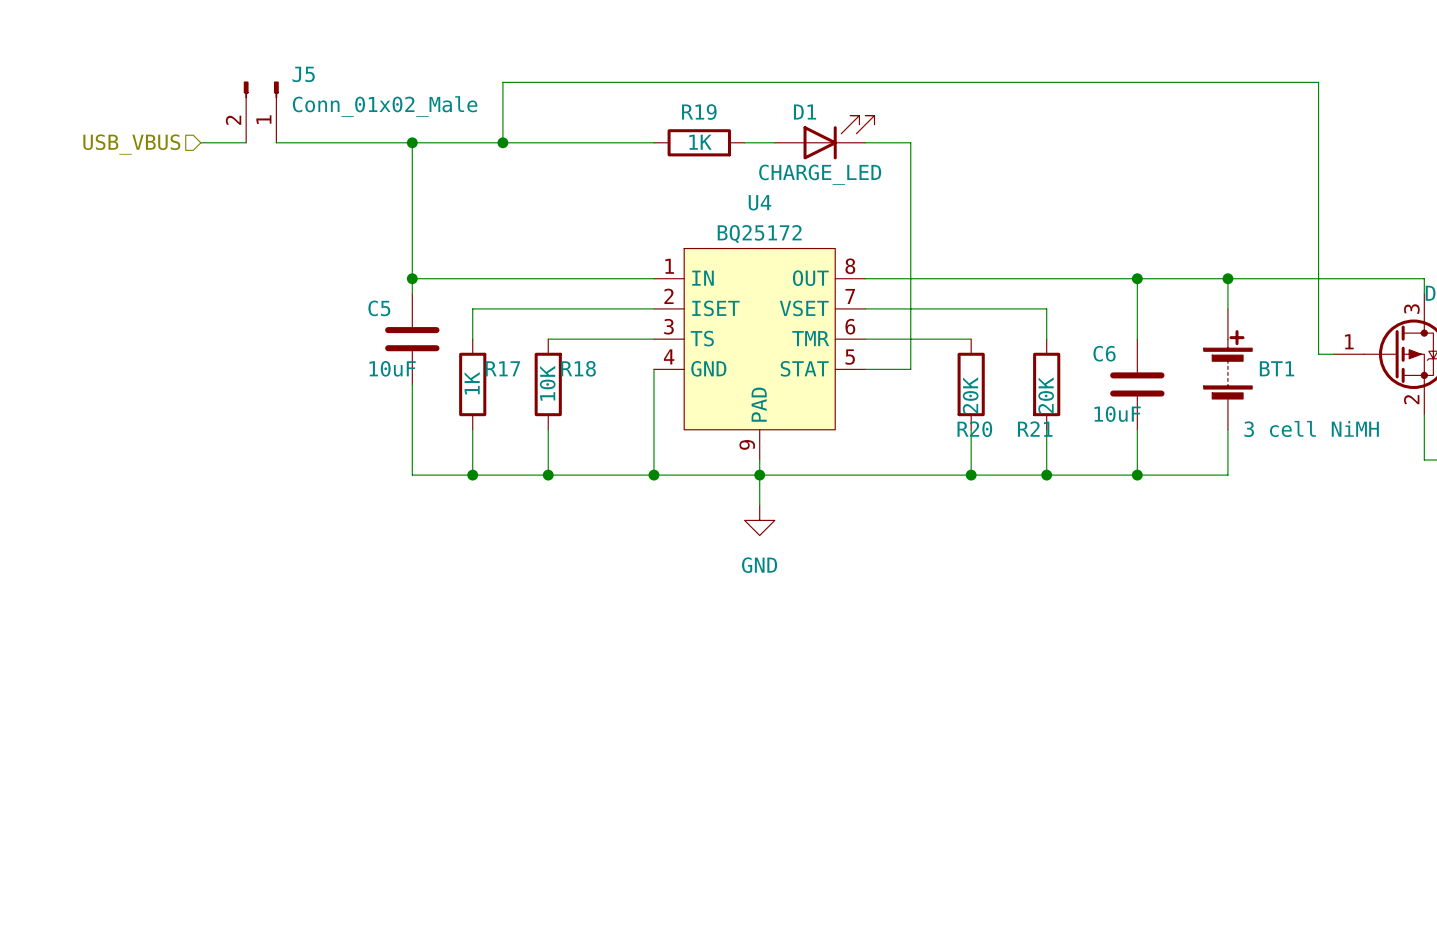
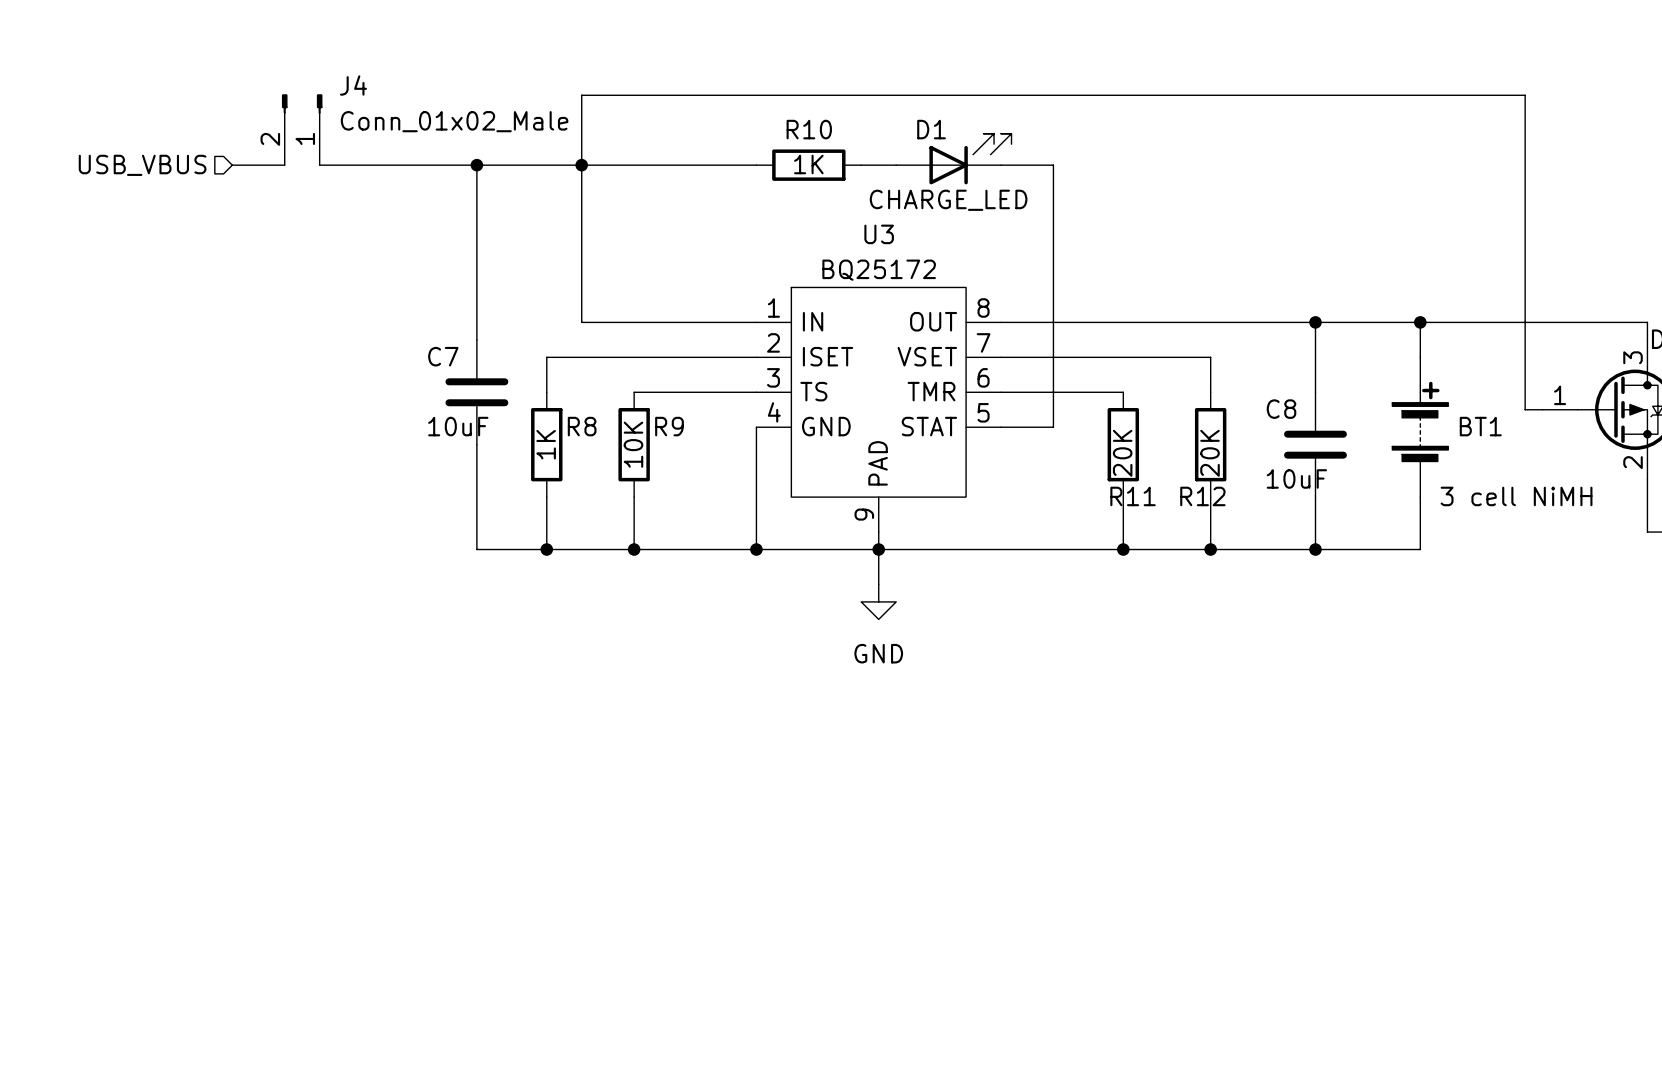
J5 name: J5 (303, 74) -> J4 (353, 85)
R19 name: R19 (699, 112) -> R10 (809, 129)
U4 name: U4 (759, 202) -> U3 (879, 234)
wire: (412, 278) (502, 278) -> (581, 165) (581, 322)
junction: (412, 278) -> none
C5 name: C5 (379, 308) -> C7 (443, 356)
C6 name: C6 (1104, 353) -> C8 (1281, 409)
R17 name: R17 (502, 368) -> R8 (582, 426)
R18 name: R18 (578, 368) -> R9 (669, 426)
R20 name: R20 (974, 429) -> R11 (1133, 496)
R21 name: R21 (1035, 429) -> R12 (1202, 496)

